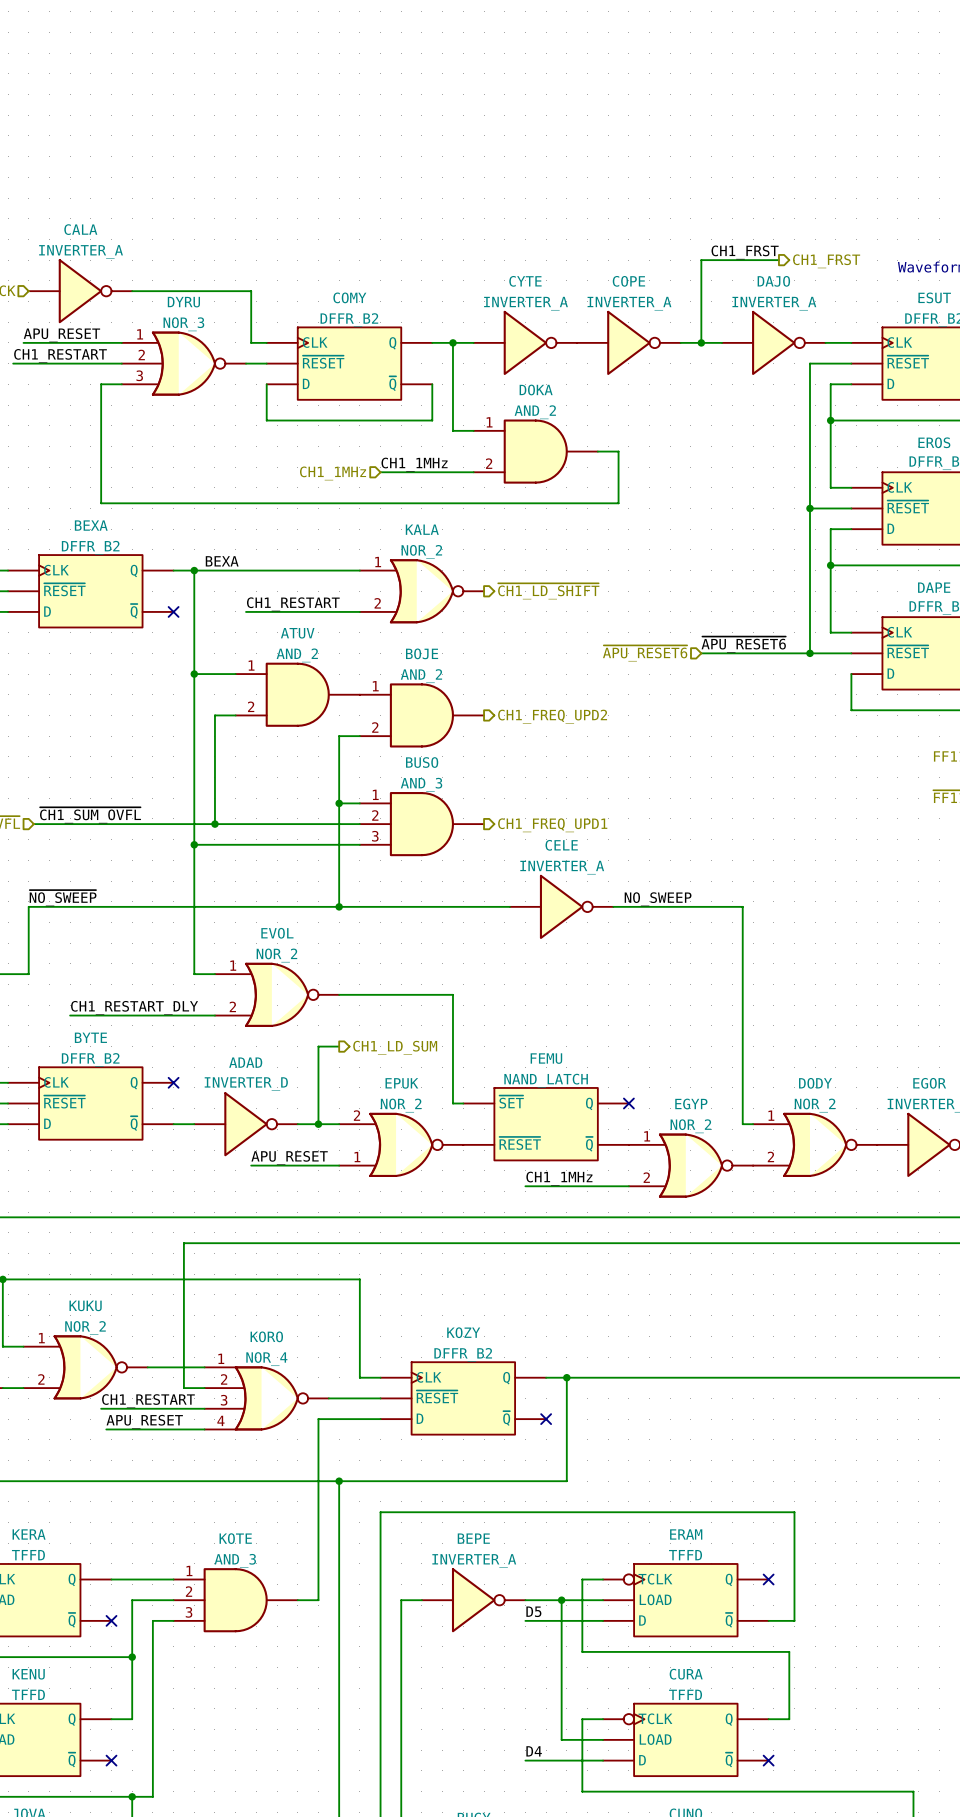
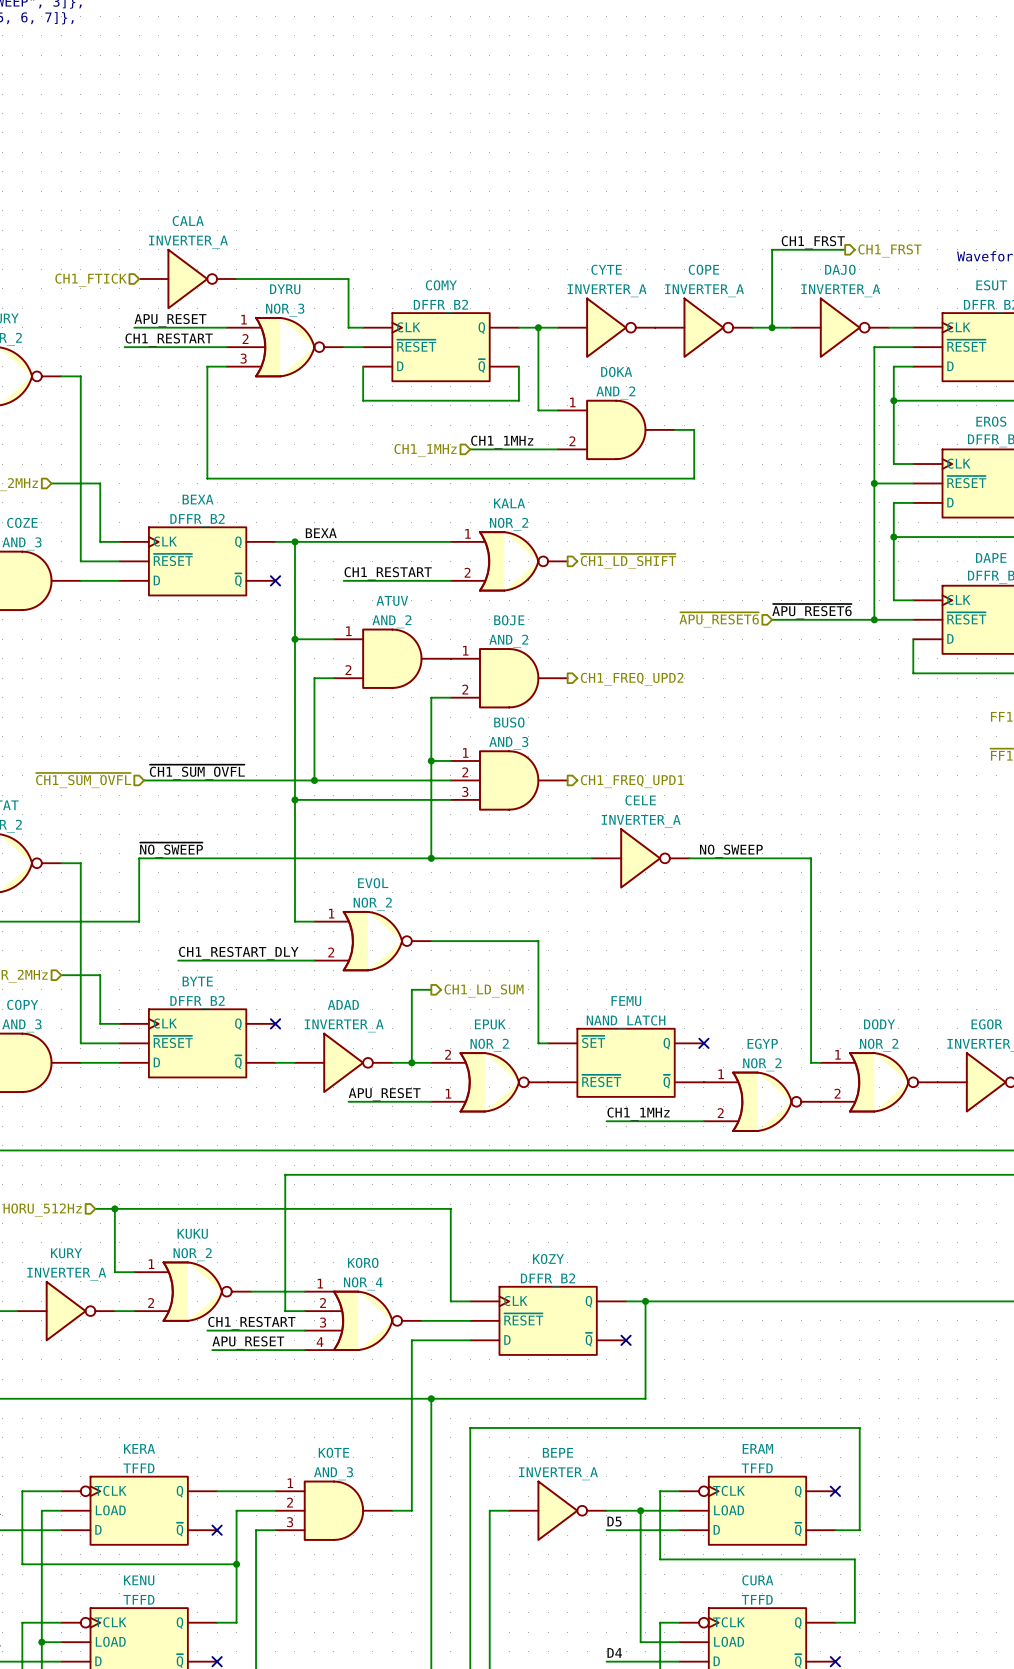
ADAD value: INVERTER_D (246, 1084) -> INVERTER_A (344, 1025)

